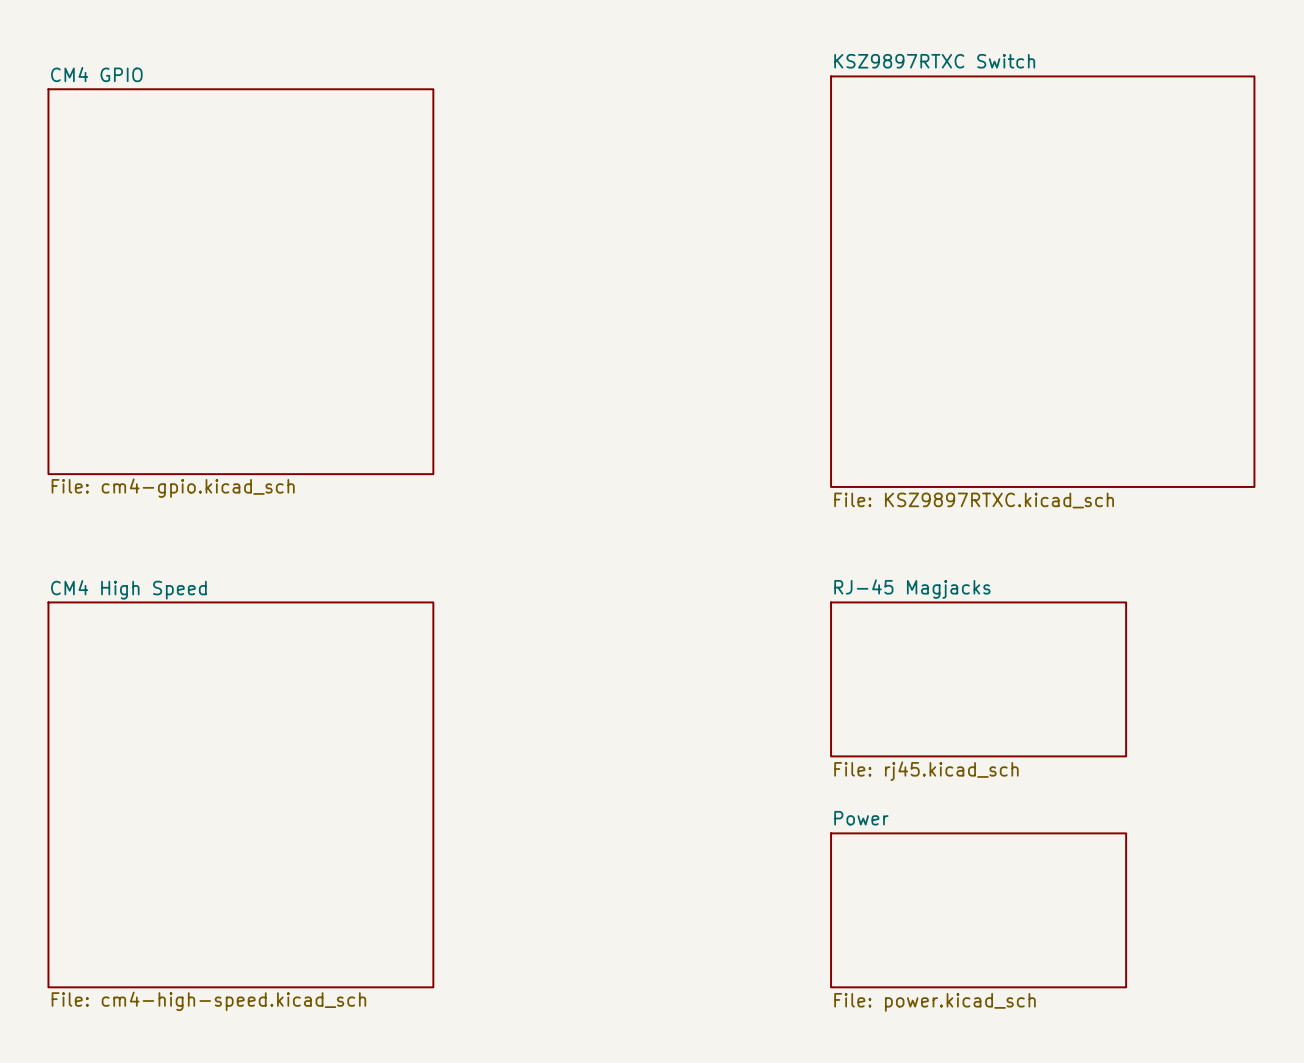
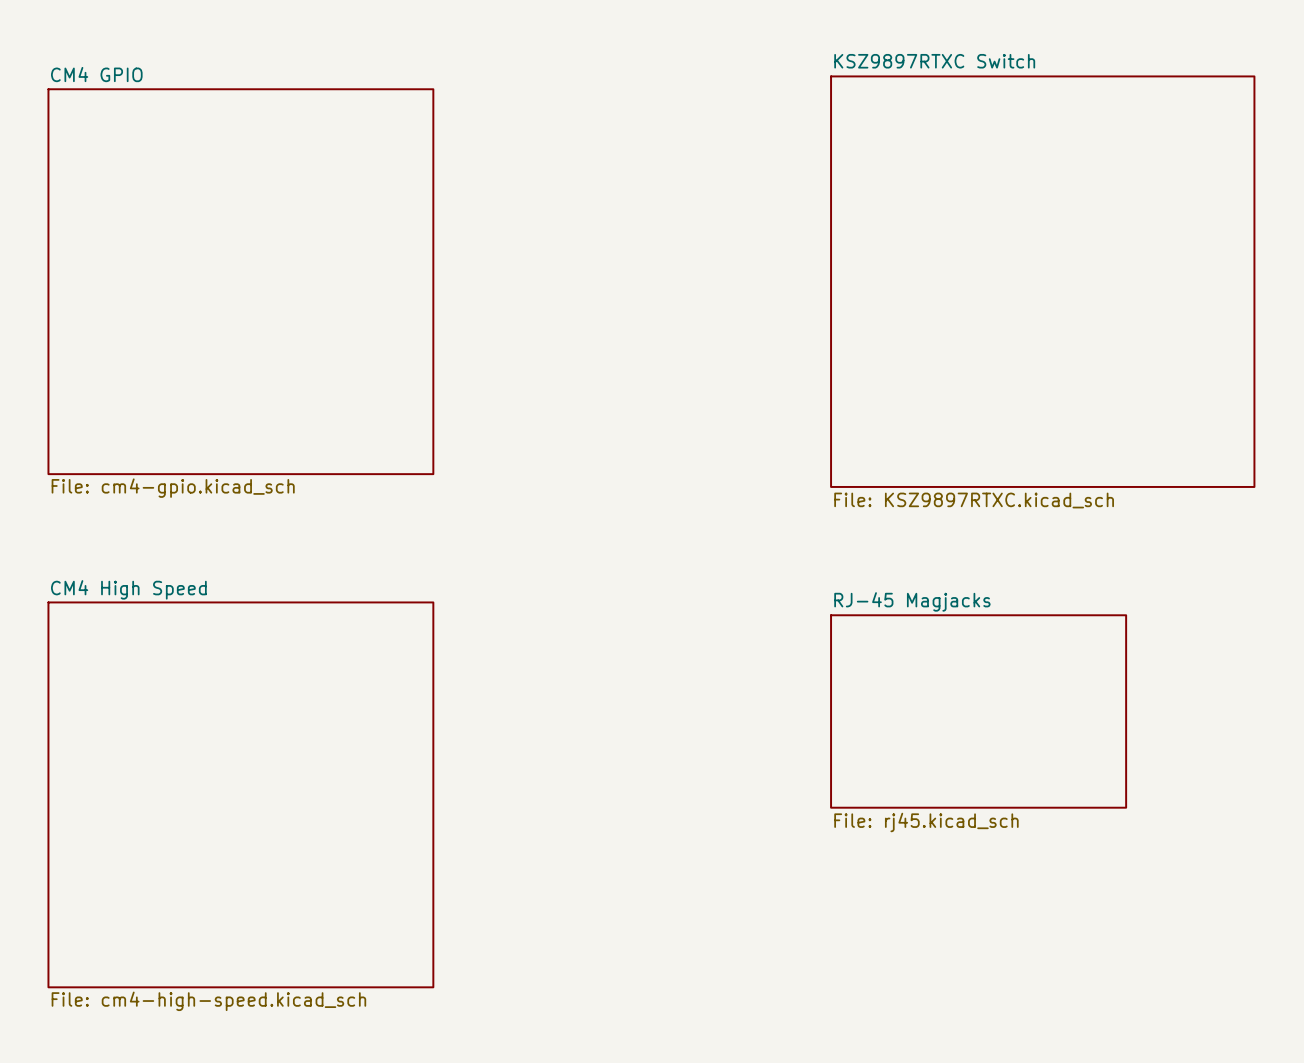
sheet RJ-45 Magjacks shape: [830, 601, 1127, 758] -> [830, 614, 1127, 809]
sheet Power: File: power.kicad_sch (978, 910) -> none

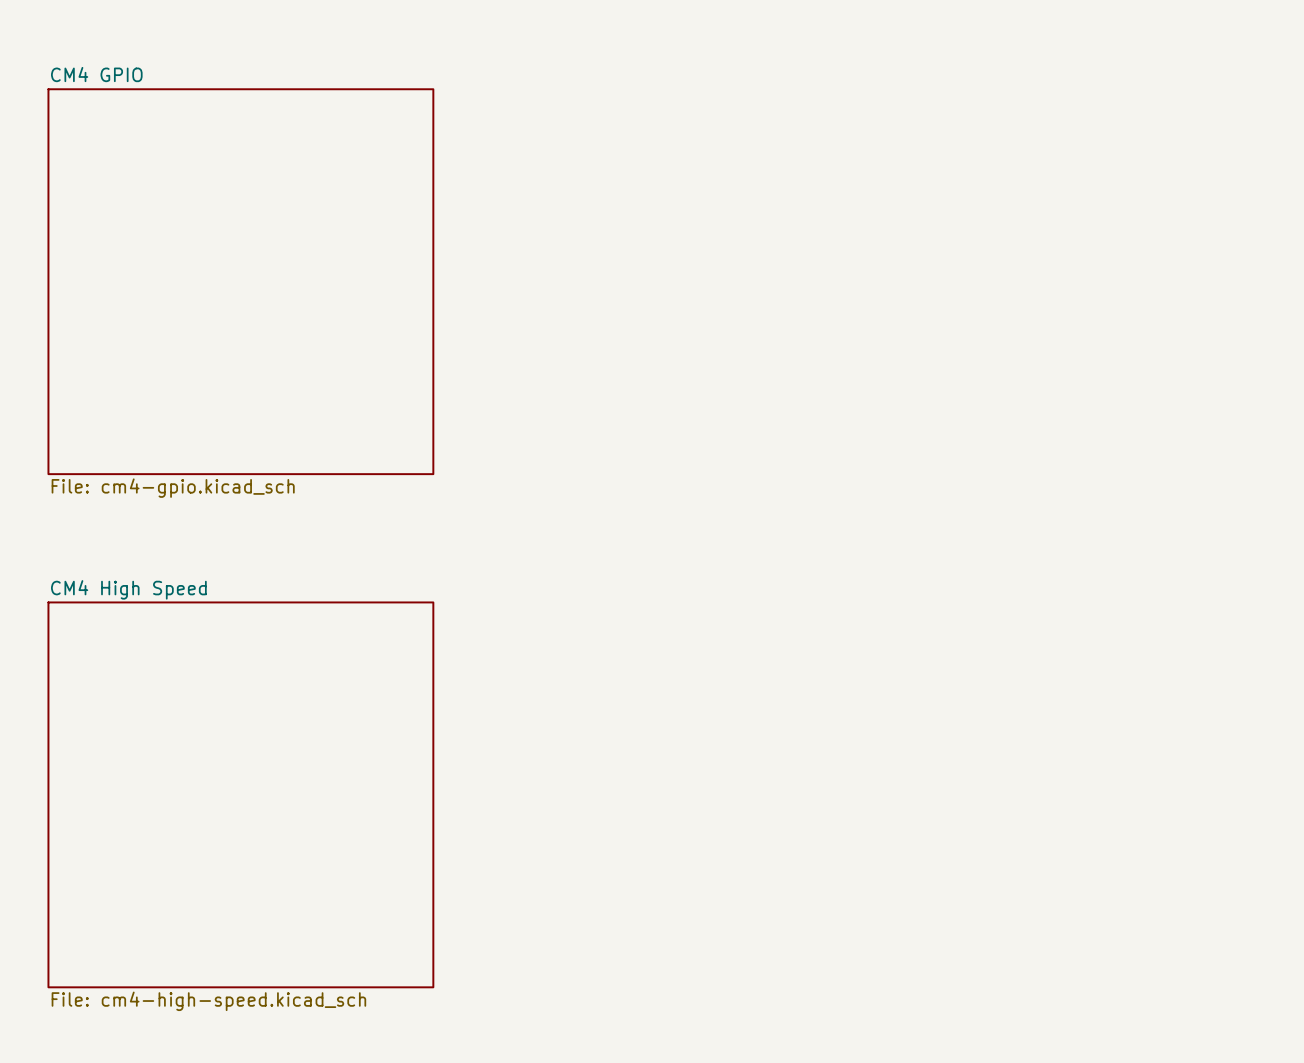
sheet KSZ9897RTXC Switch: File: KSZ9897RTXC.kicad_sch (1042, 281) -> none
sheet RJ-45 Magjacks: File: rj45.kicad_sch (978, 711) -> none

